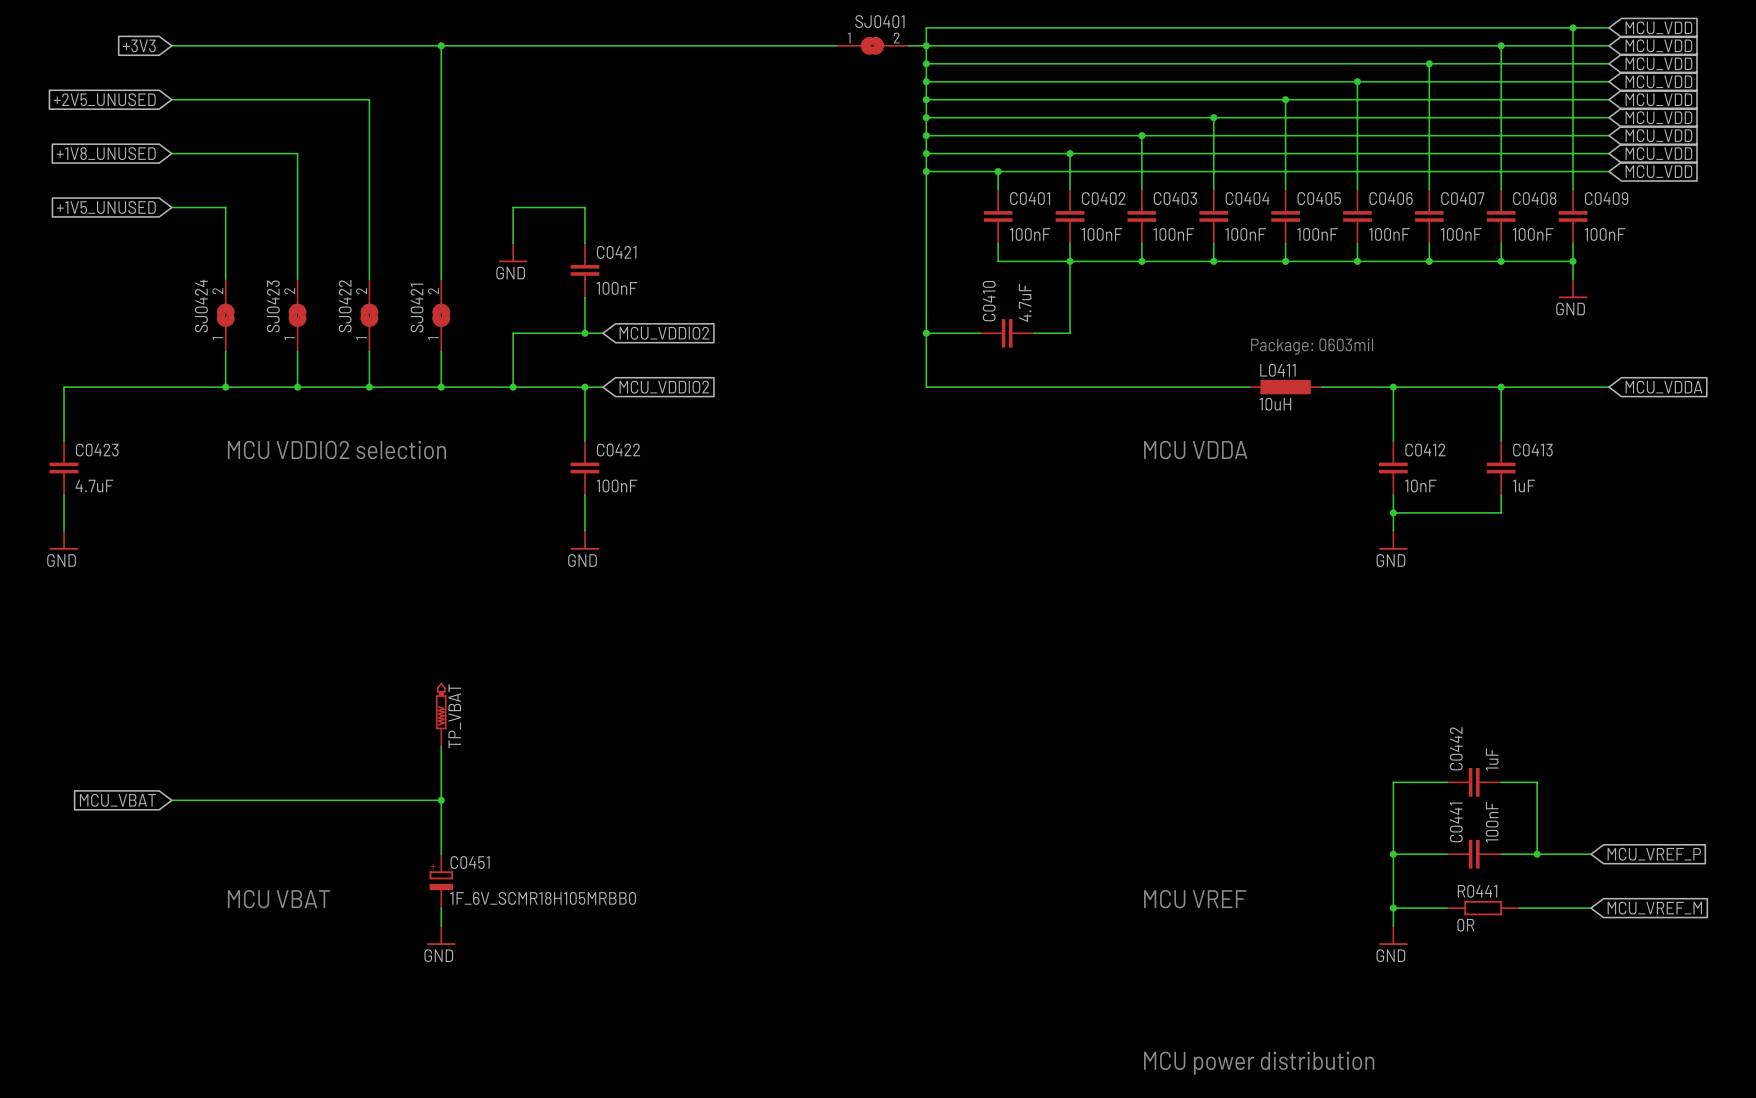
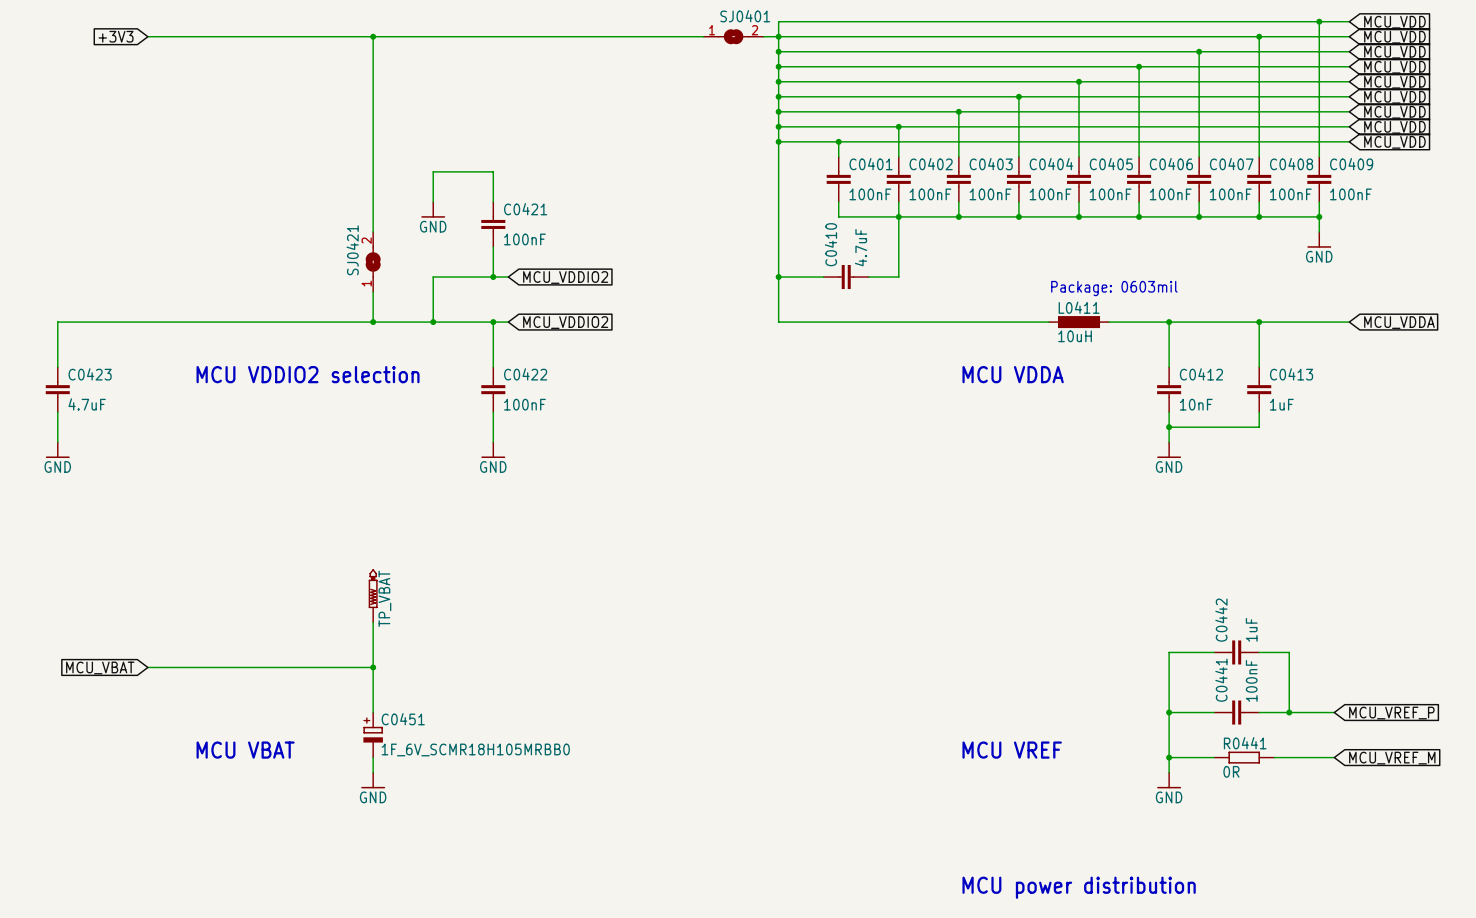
global label: +2V5_UNUSED (104, 99) -> none
wire: (171, 99) (369, 99) (369, 279) -> none
global label: +1V8_UNUSED (106, 153) -> none
wire: (171, 153) (297, 153) (297, 279) -> none
global label: +1V5_UNUSED (106, 207) -> none
wire: (171, 207) (225, 207) (225, 279) -> none
SJ0424: (225, 315) -> none
SJ0423: (297, 315) -> none
SJ0422: (369, 315) -> none
wire: (225, 351) (225, 387) -> none
wire: (297, 351) (297, 387) -> none
wire: (369, 351) (369, 387) -> none
junction: (225, 387) -> none
junction: (297, 387) -> none
junction: (369, 387) -> none

